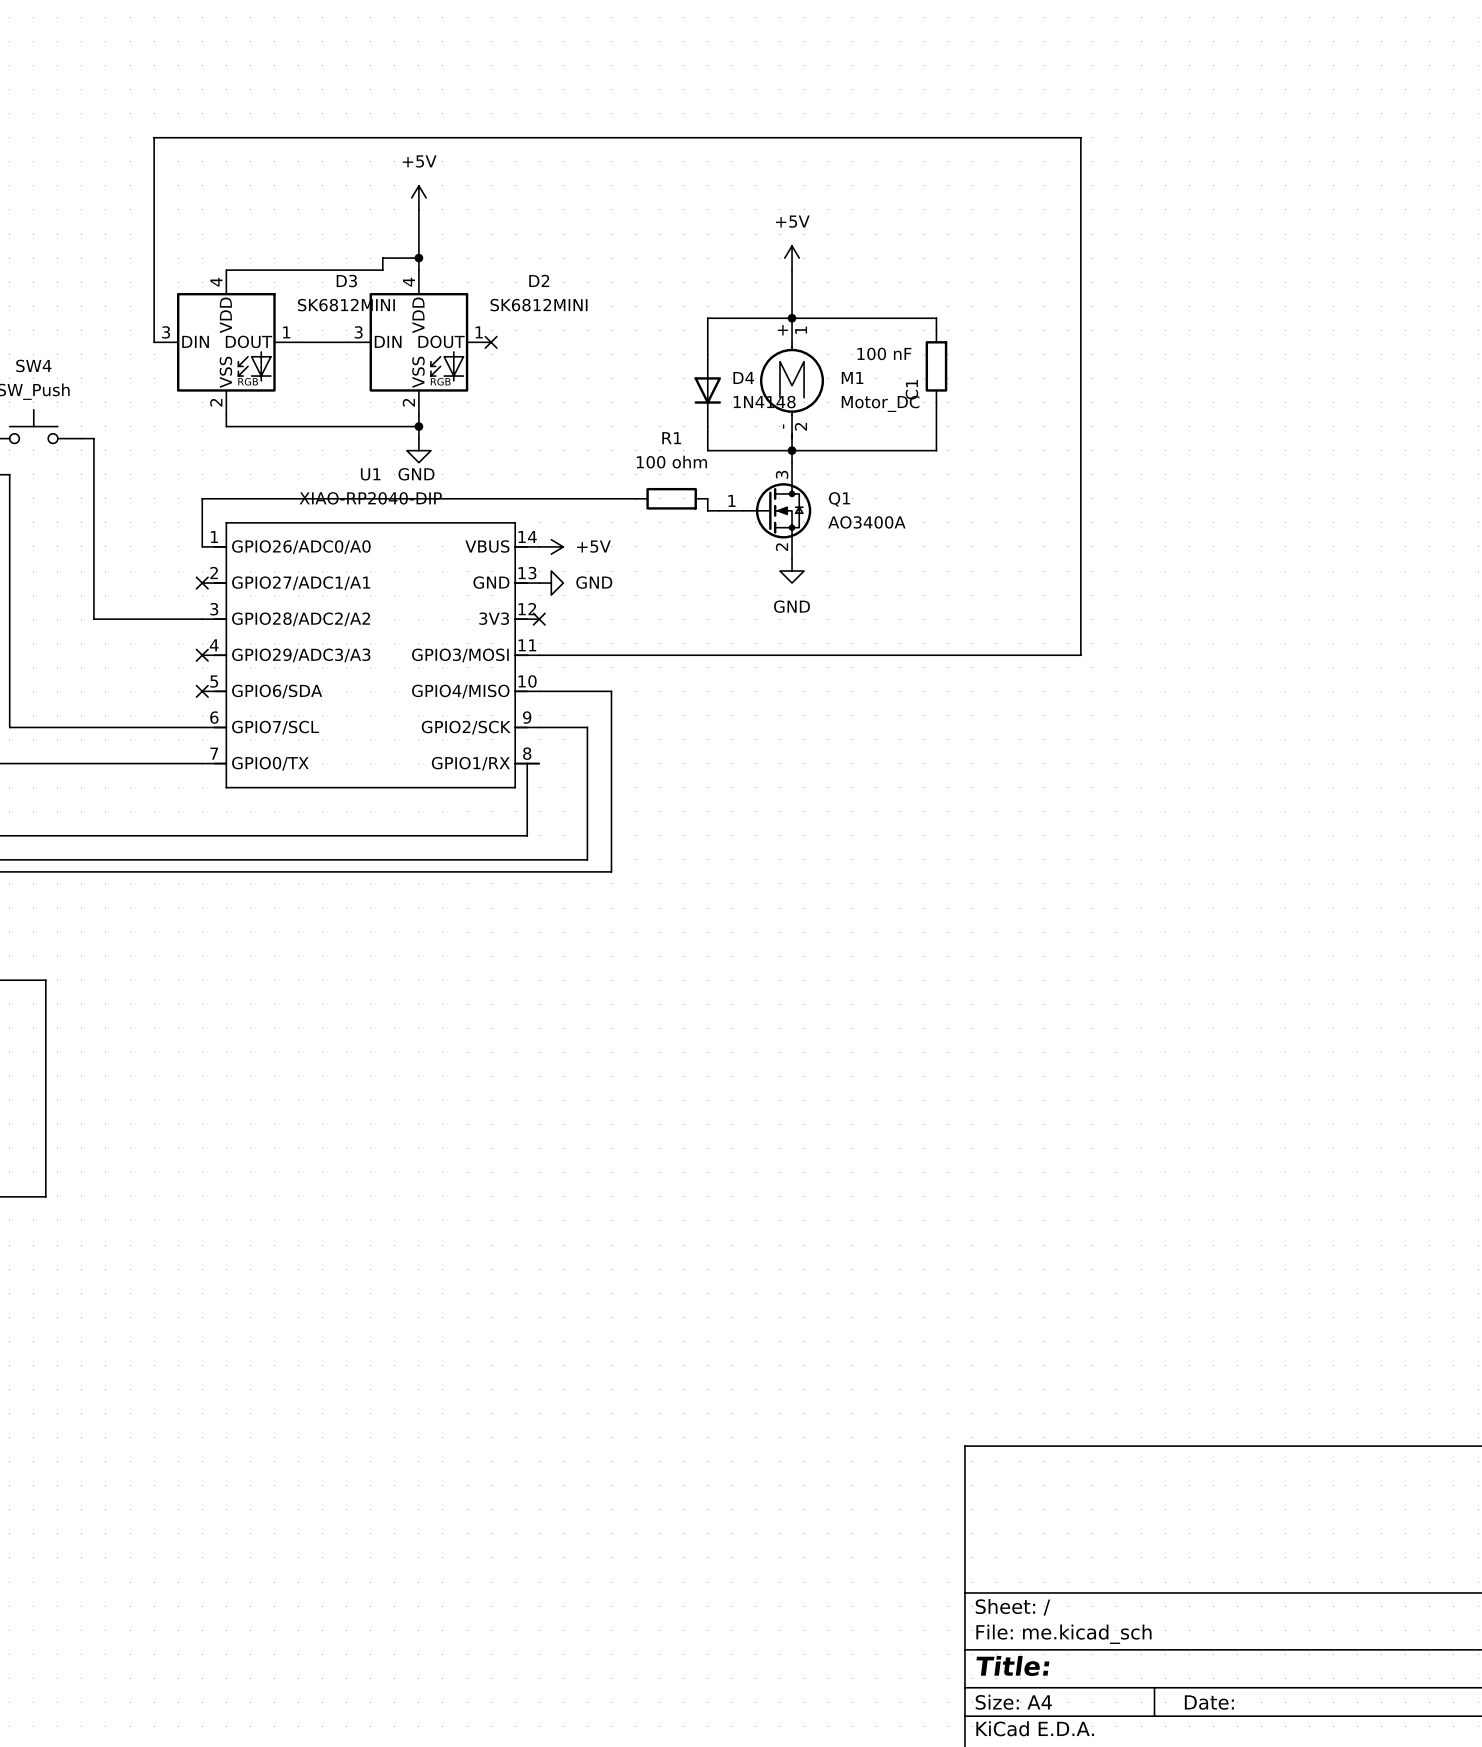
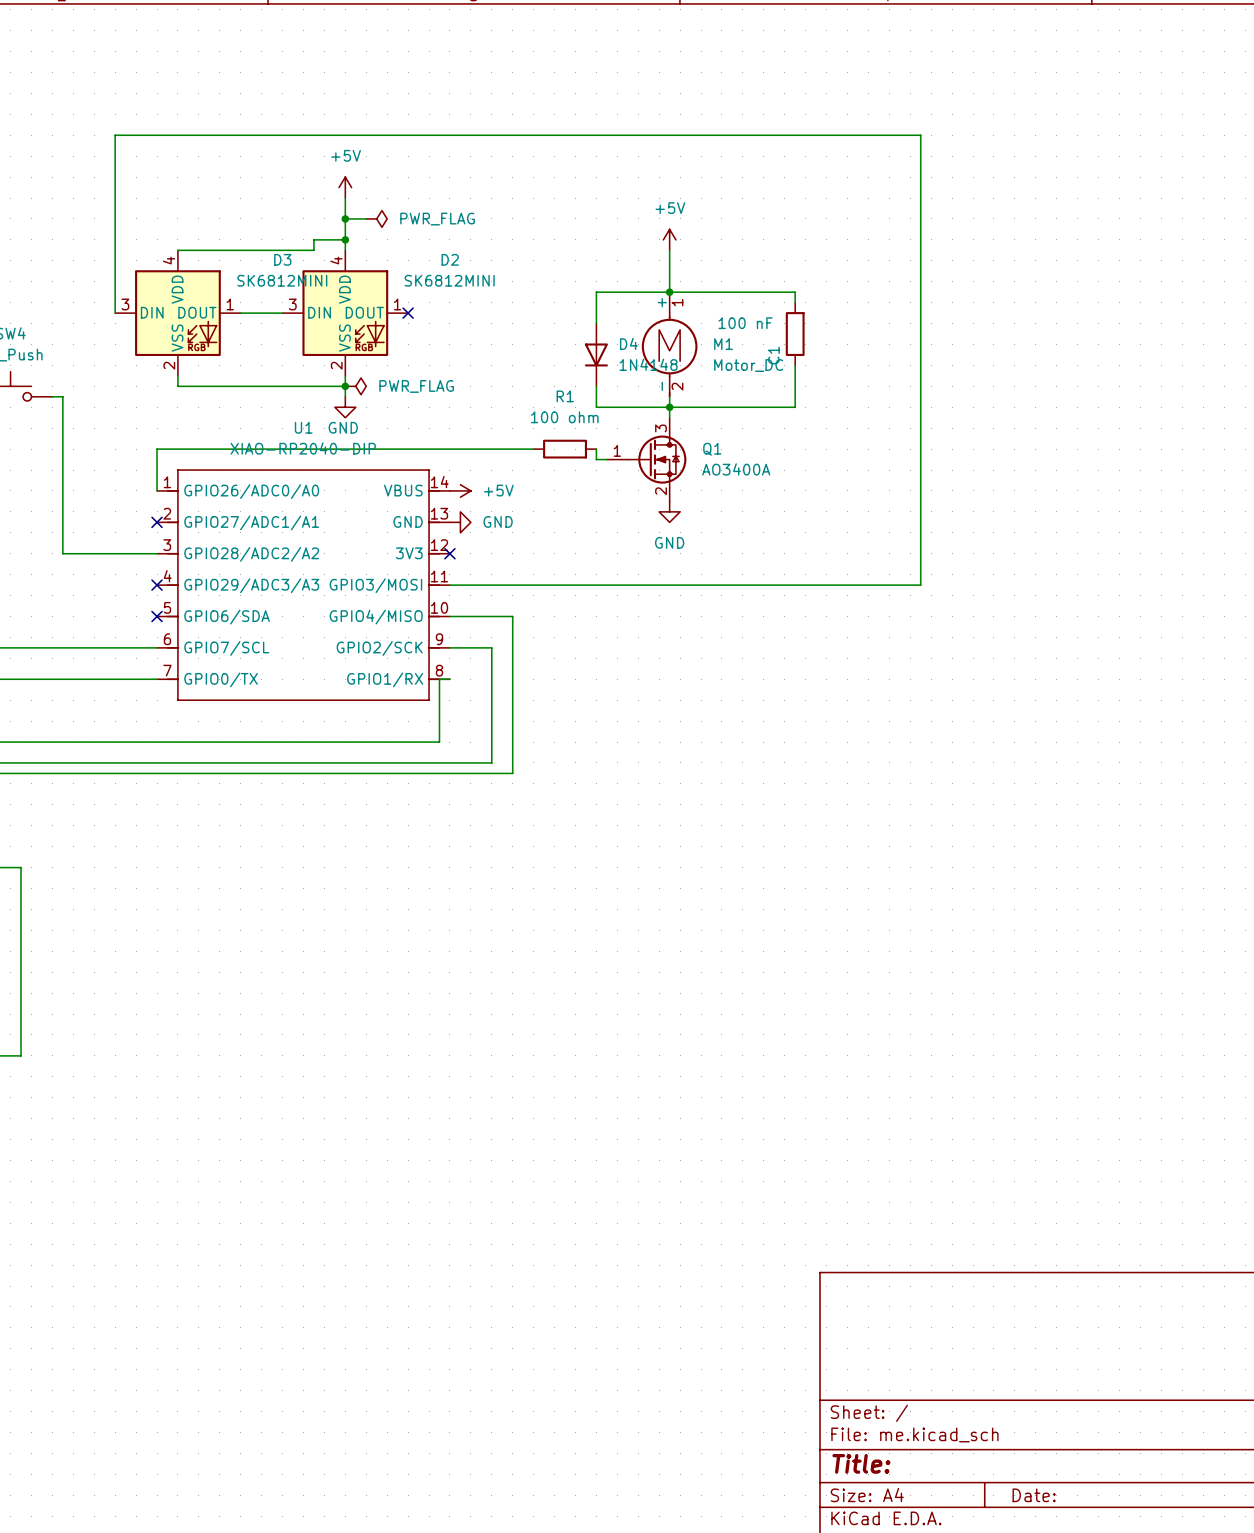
wire: none -> (345, 218) (366, 218)
junction: none -> (345, 218)
power symbol: none -> PWR_FLAG (376, 218)
power symbol: none -> PWR_FLAG (355, 386)

